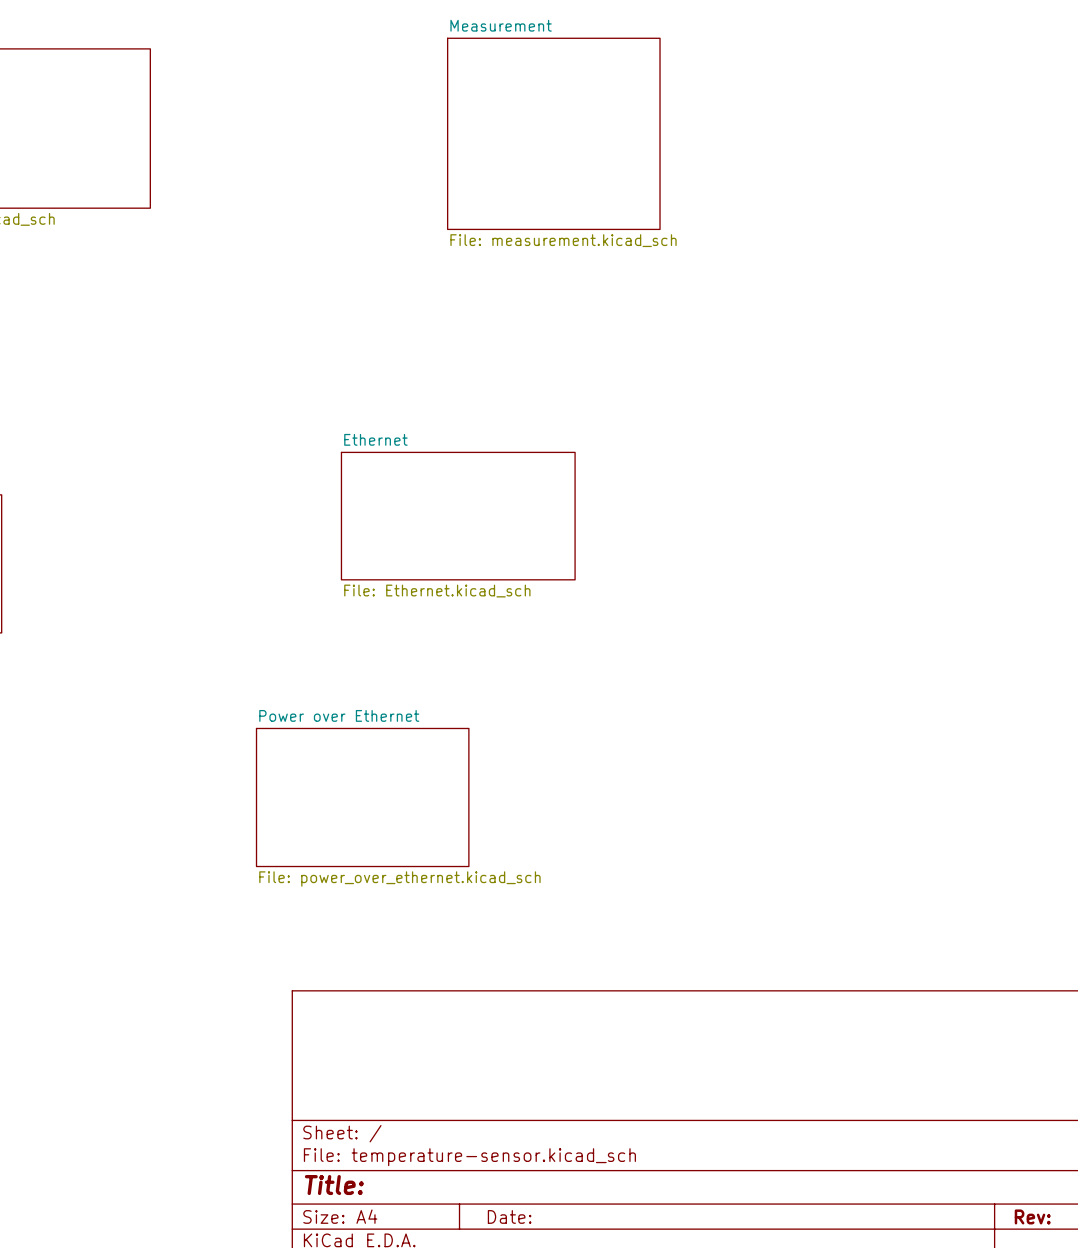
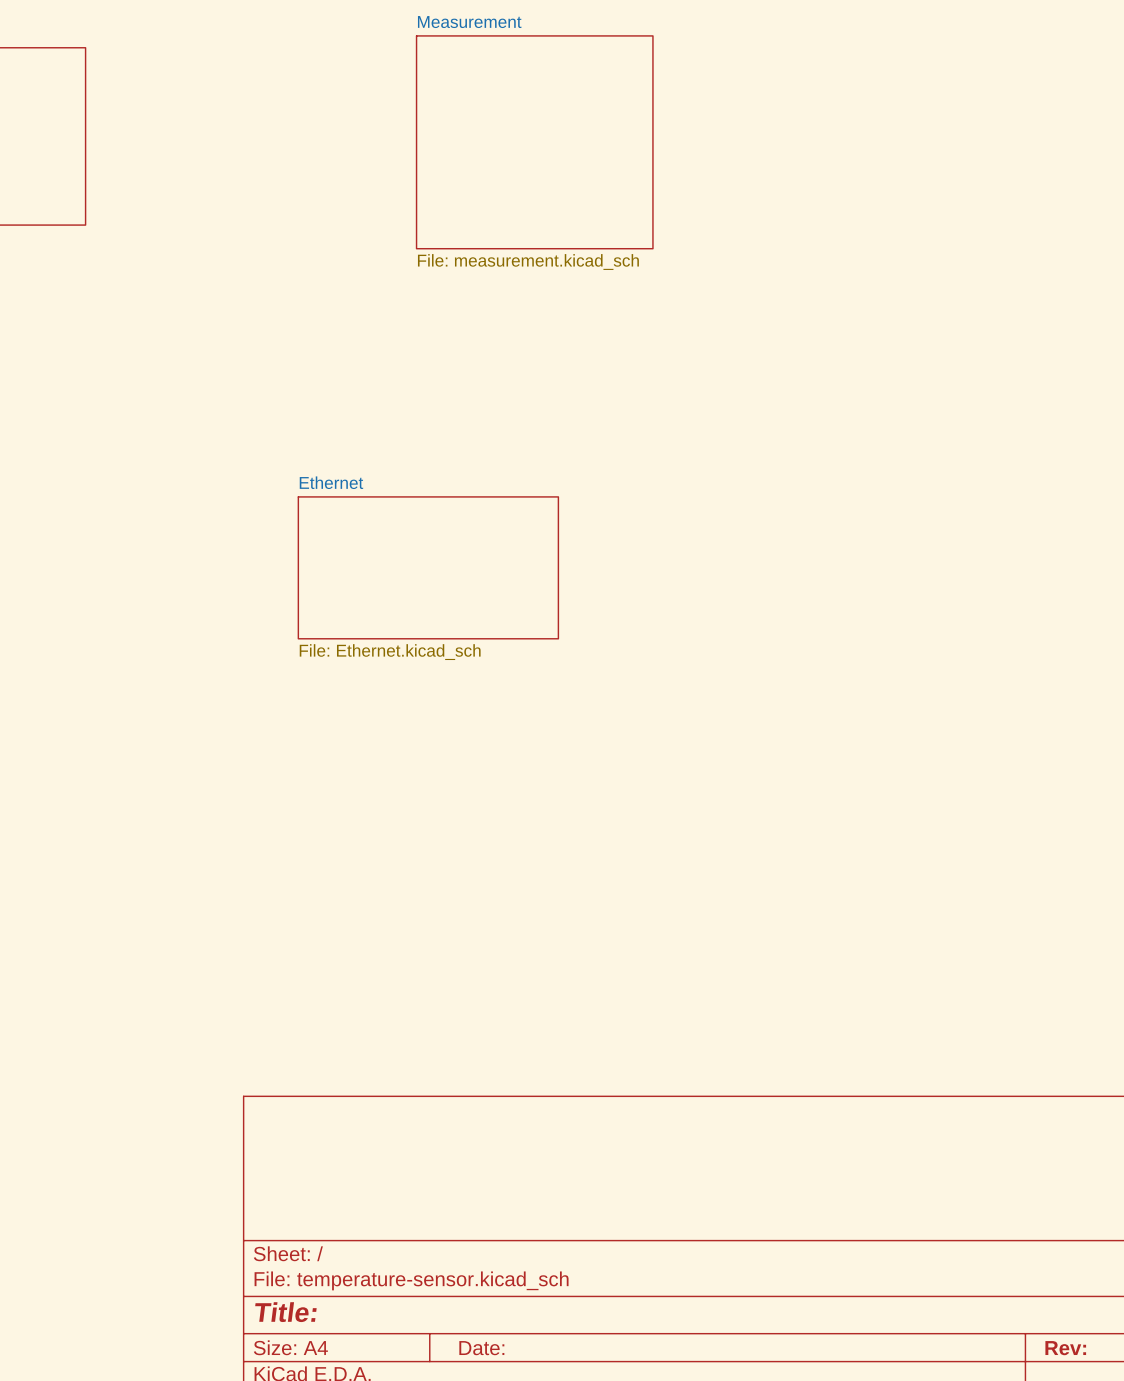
sheet Power over Ethernet: File: power_over_ethernet.kicad_sch (362, 797) -> none

